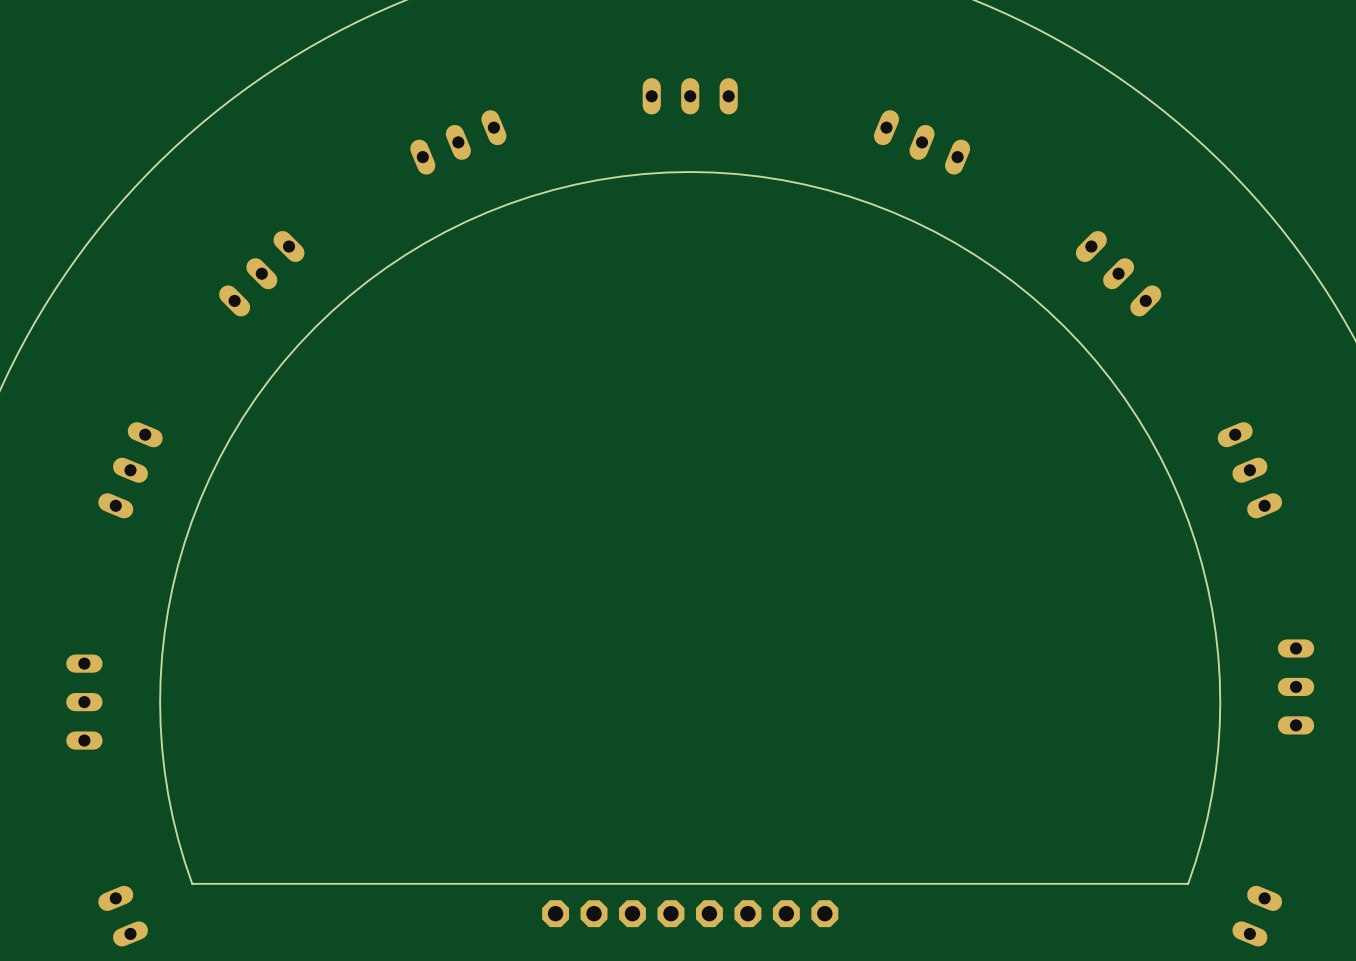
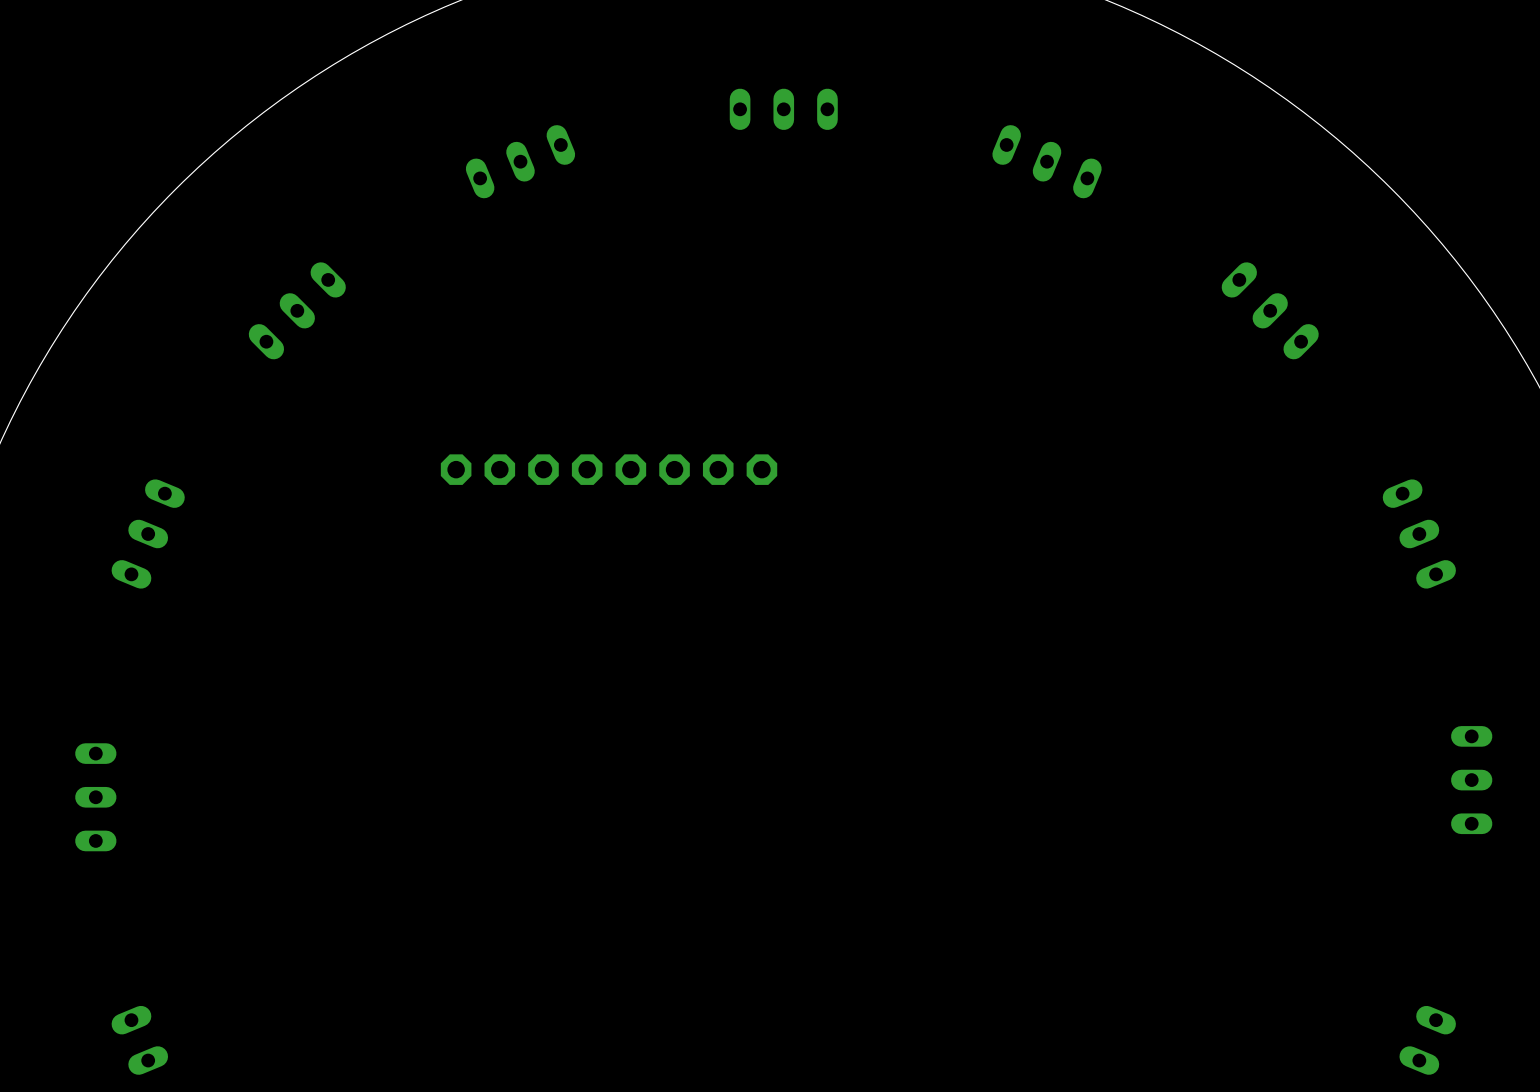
part: none -> (609, 469)
board edge: (1188, 883) (192, 883) (178, 839) (168, 794) (162, 748) (160, 702) (162, 656) (168, 610) (178, 565) (191, 521) (209, 478) (231, 437) (255, 398) (299, 344) (331, 311) (367, 281) (425, 243) (466, 221) (508, 204) (552, 190) (598, 180) (667, 172) (713, 172) (782, 180) (827, 190) (871, 204) (914, 221) (955, 243) (1013, 281) (1048, 311) (1096, 361) (1124, 398) (1149, 437) (1170, 478) (1188, 521) (1202, 565) (1212, 610) (1219, 679) (1218, 748) (1212, 794) (1202, 839) (1188, 883) -> none
part: (690, 913) -> none

